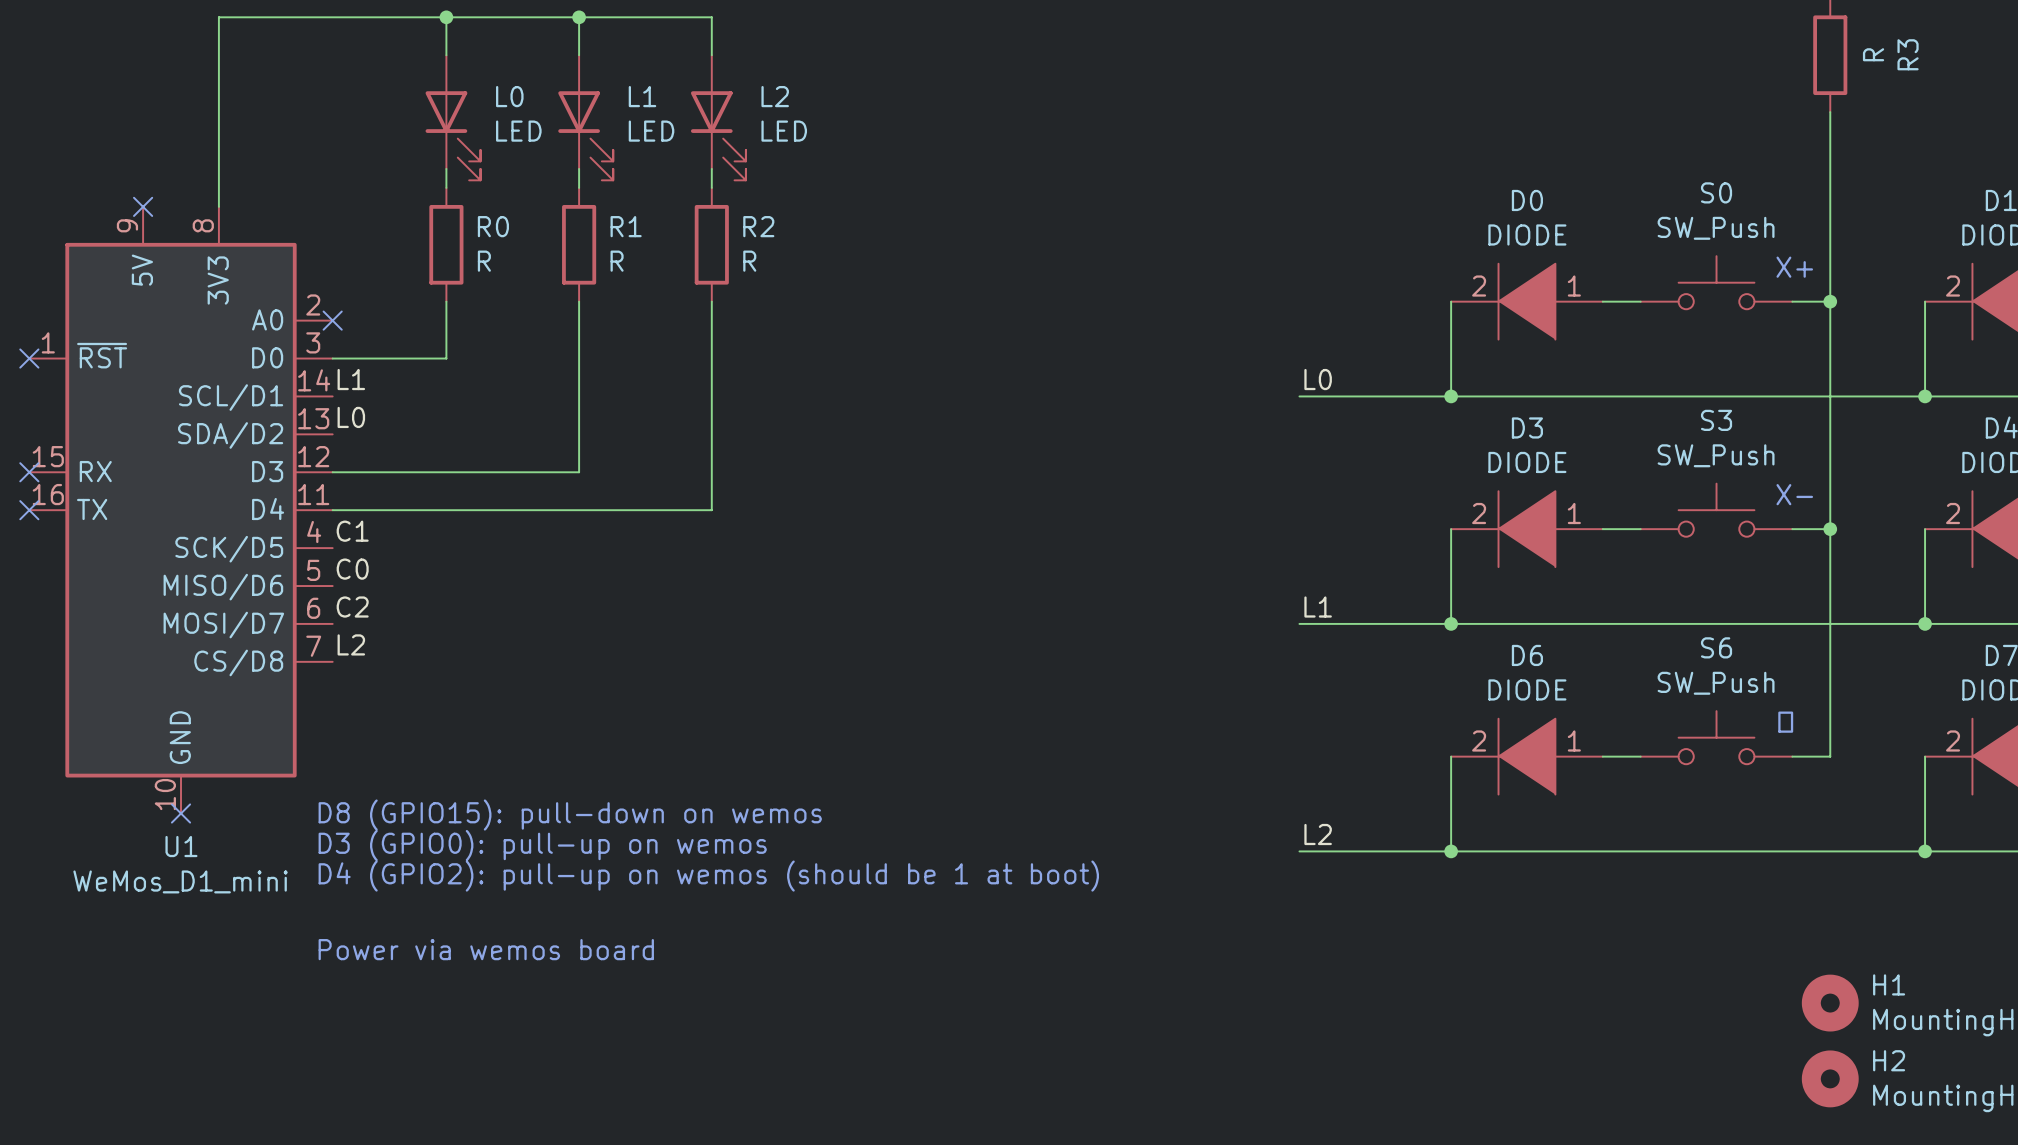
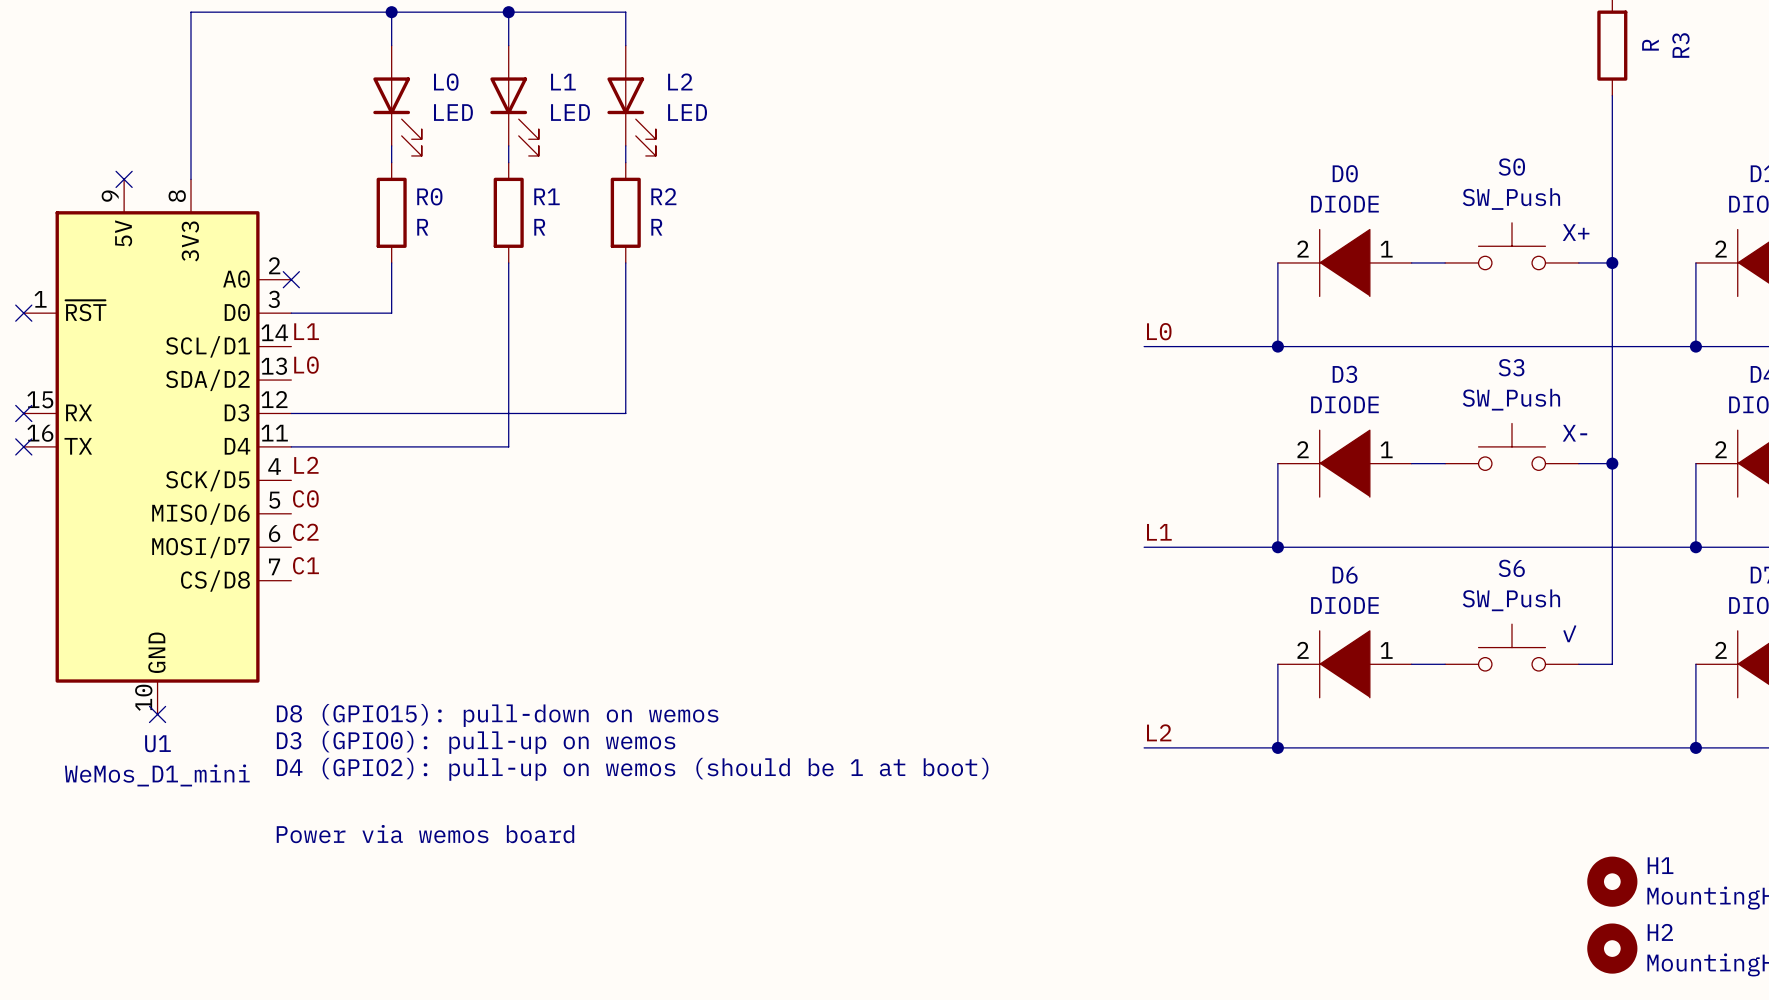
wire: (711, 472) (711, 510) (579, 510) -> (625, 413) (508, 413) (508, 446)
label: C1 (352, 531) -> L2 (306, 465)
label: L2 (351, 644) -> C1 (305, 565)

